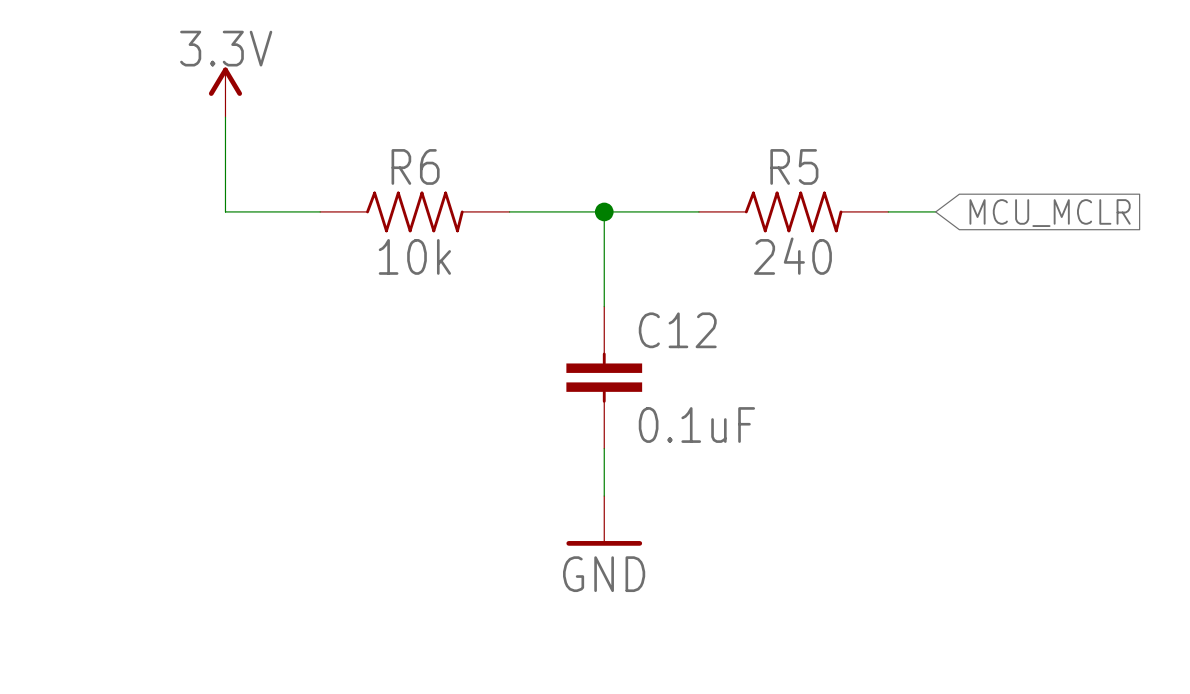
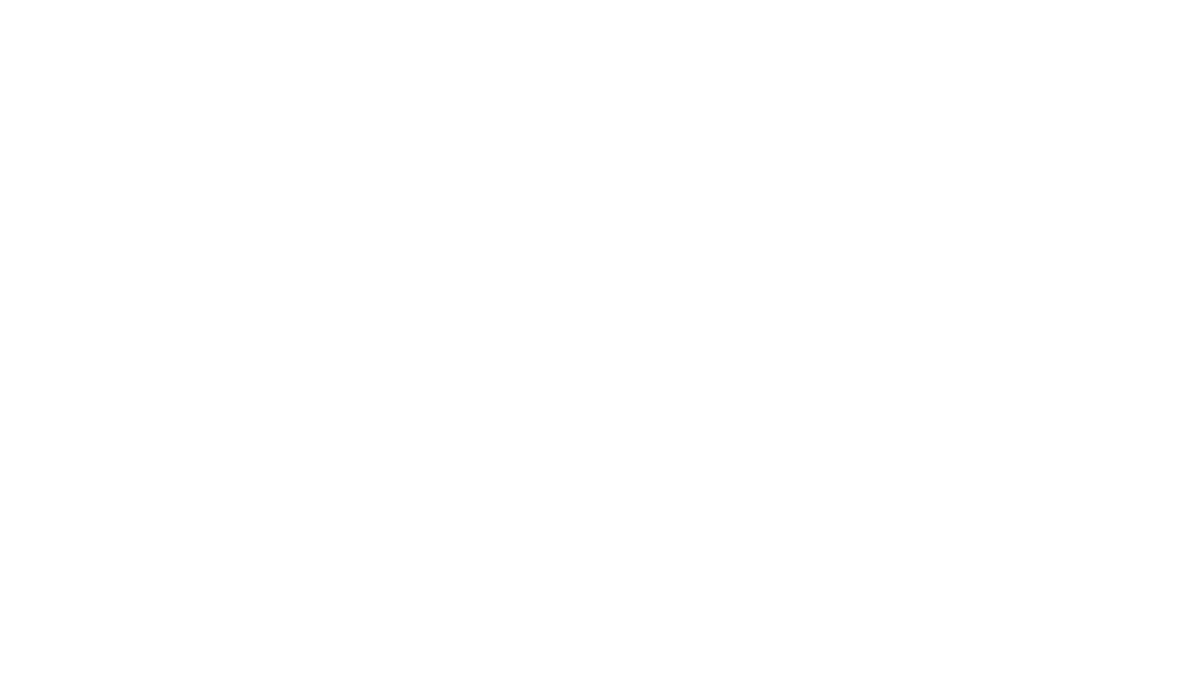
power symbol: 3.3V (225, 92) -> none
wire: (225, 117) (225, 211) (320, 211) -> none
R6: 10k (414, 211) -> none
wire: (509, 211) (698, 211) -> none
wire: (604, 211) (604, 306) -> none
junction: (604, 211) -> none
R5: 240 (793, 211) -> none
wire: (888, 211) (935, 211) -> none
global label: MCU_MCLR (1050, 213) -> none
C12: 0.1uF (604, 377) -> none
wire: (604, 448) (604, 496) -> none
power symbol: GND (604, 520) -> none

